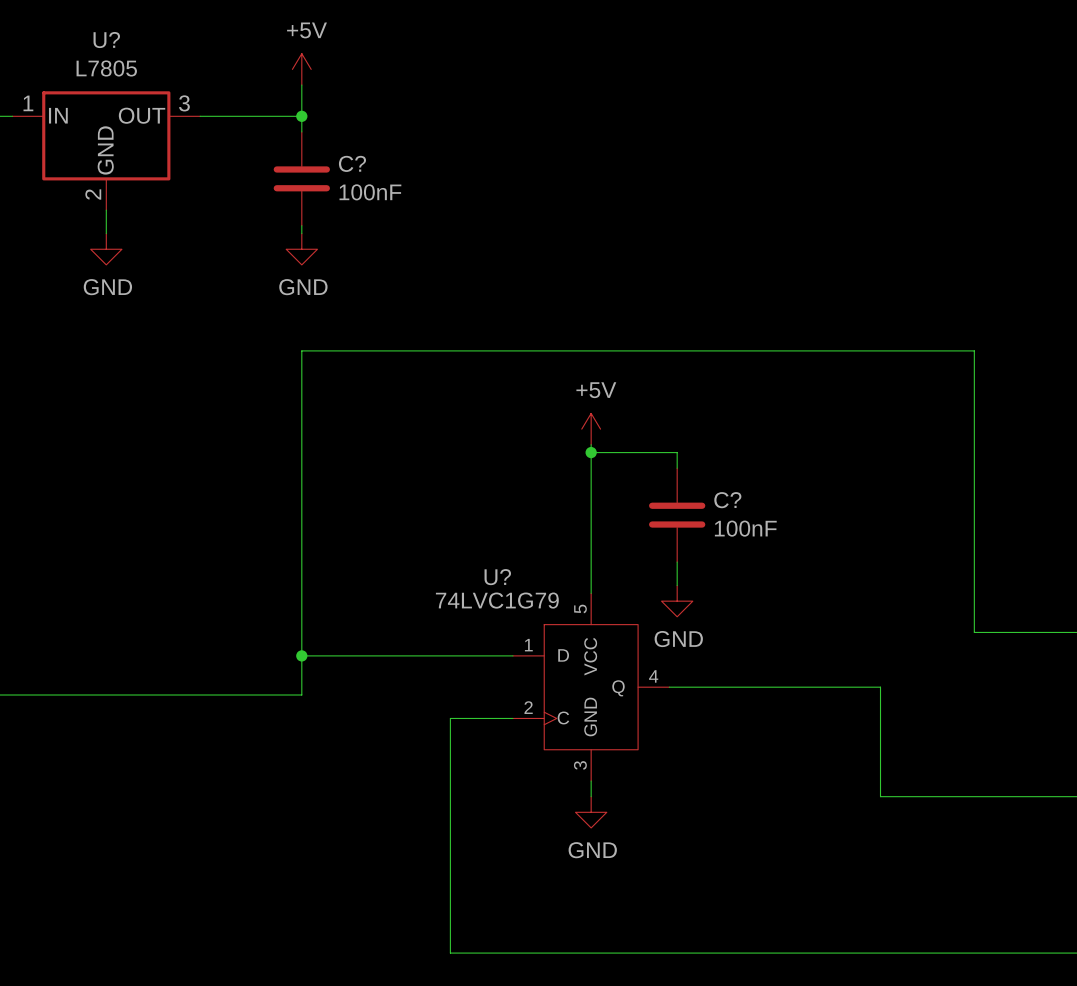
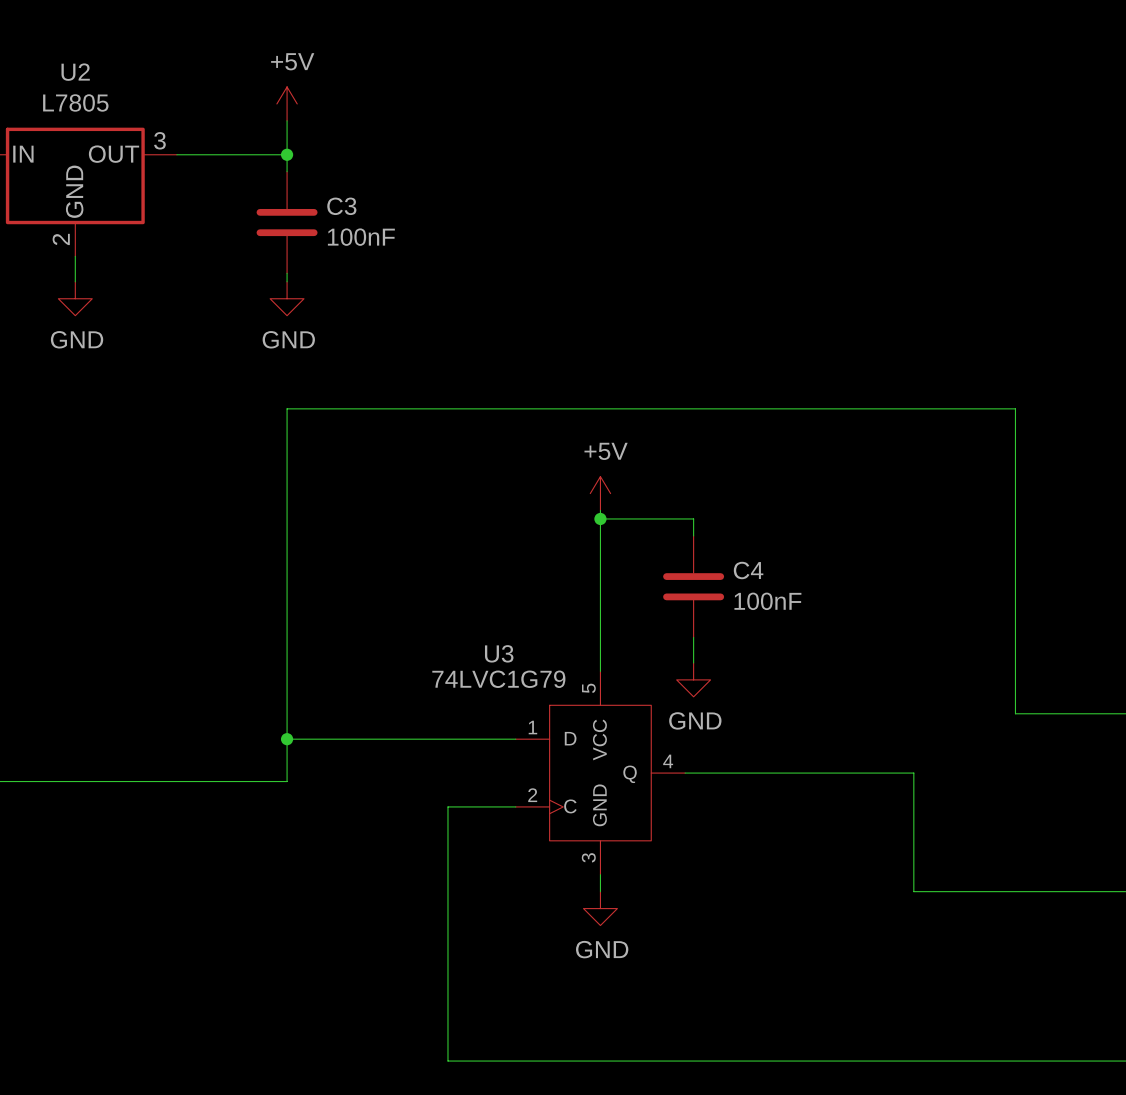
U? name: U? (106, 40) -> U2 (75, 72)
C? name: C? (352, 163) -> C3 (341, 206)
C? name: C? (727, 500) -> C4 (748, 570)
U? name: U? (497, 577) -> U3 (499, 653)

